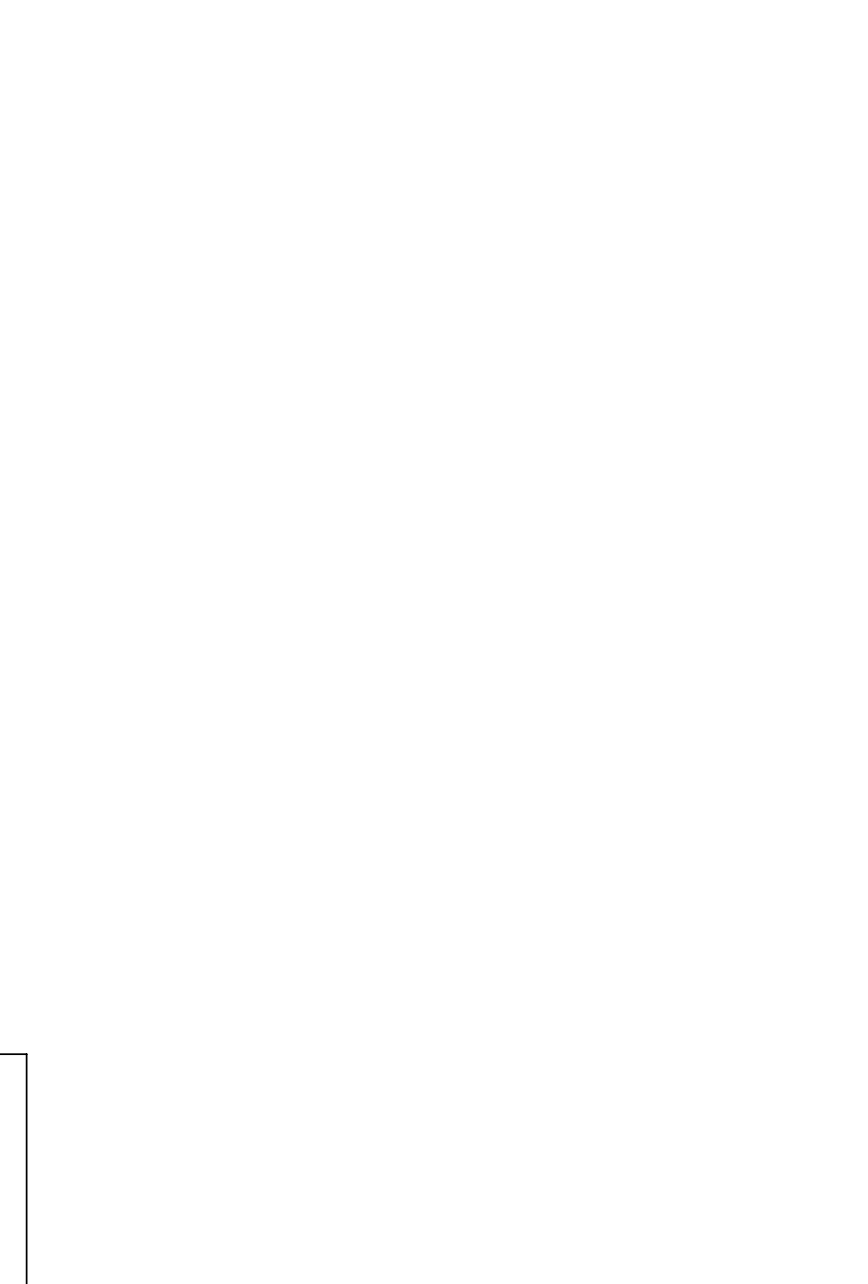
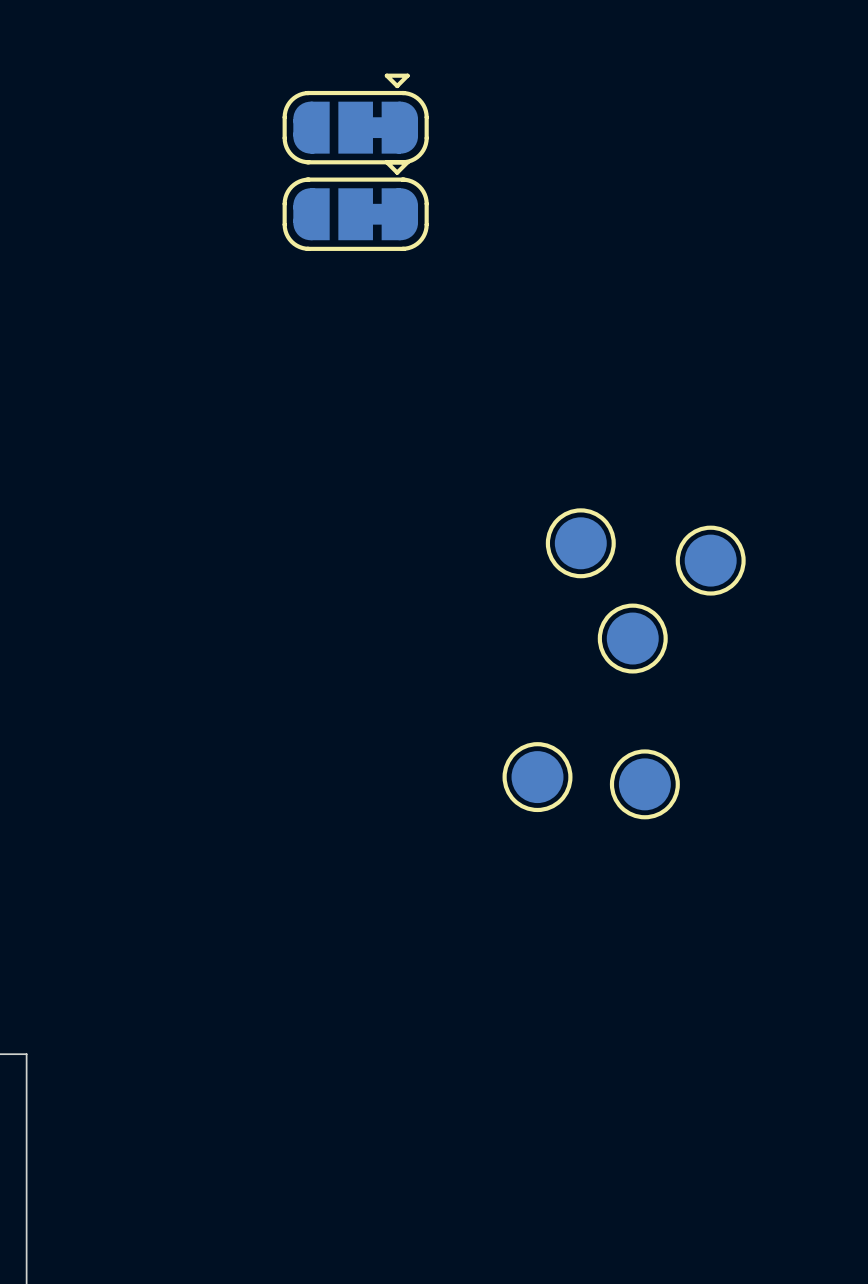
part: none -> (355, 118)
part: none -> (355, 205)
part: none -> (580, 543)
part: none -> (710, 560)
part: none -> (632, 638)
part: none -> (537, 777)
part: none -> (644, 784)

